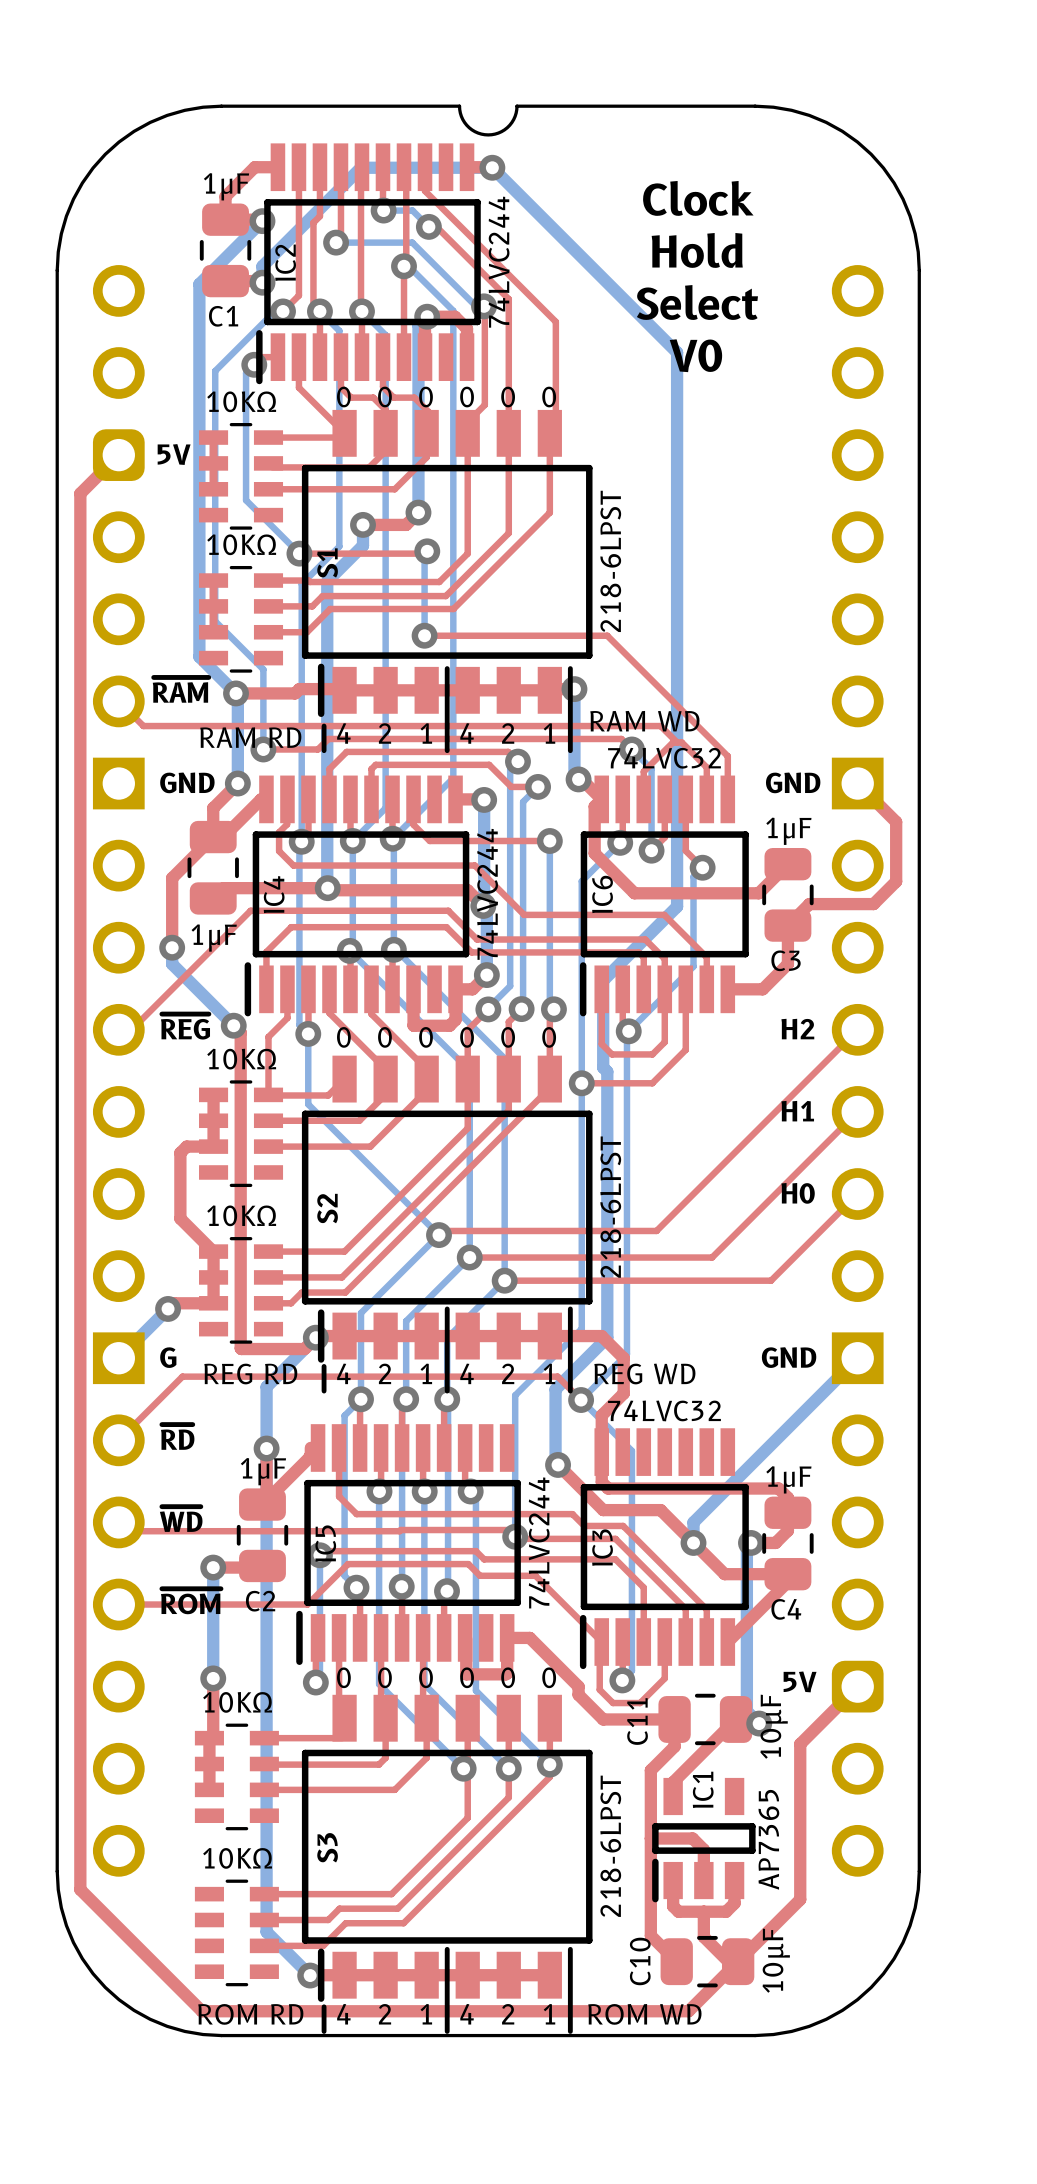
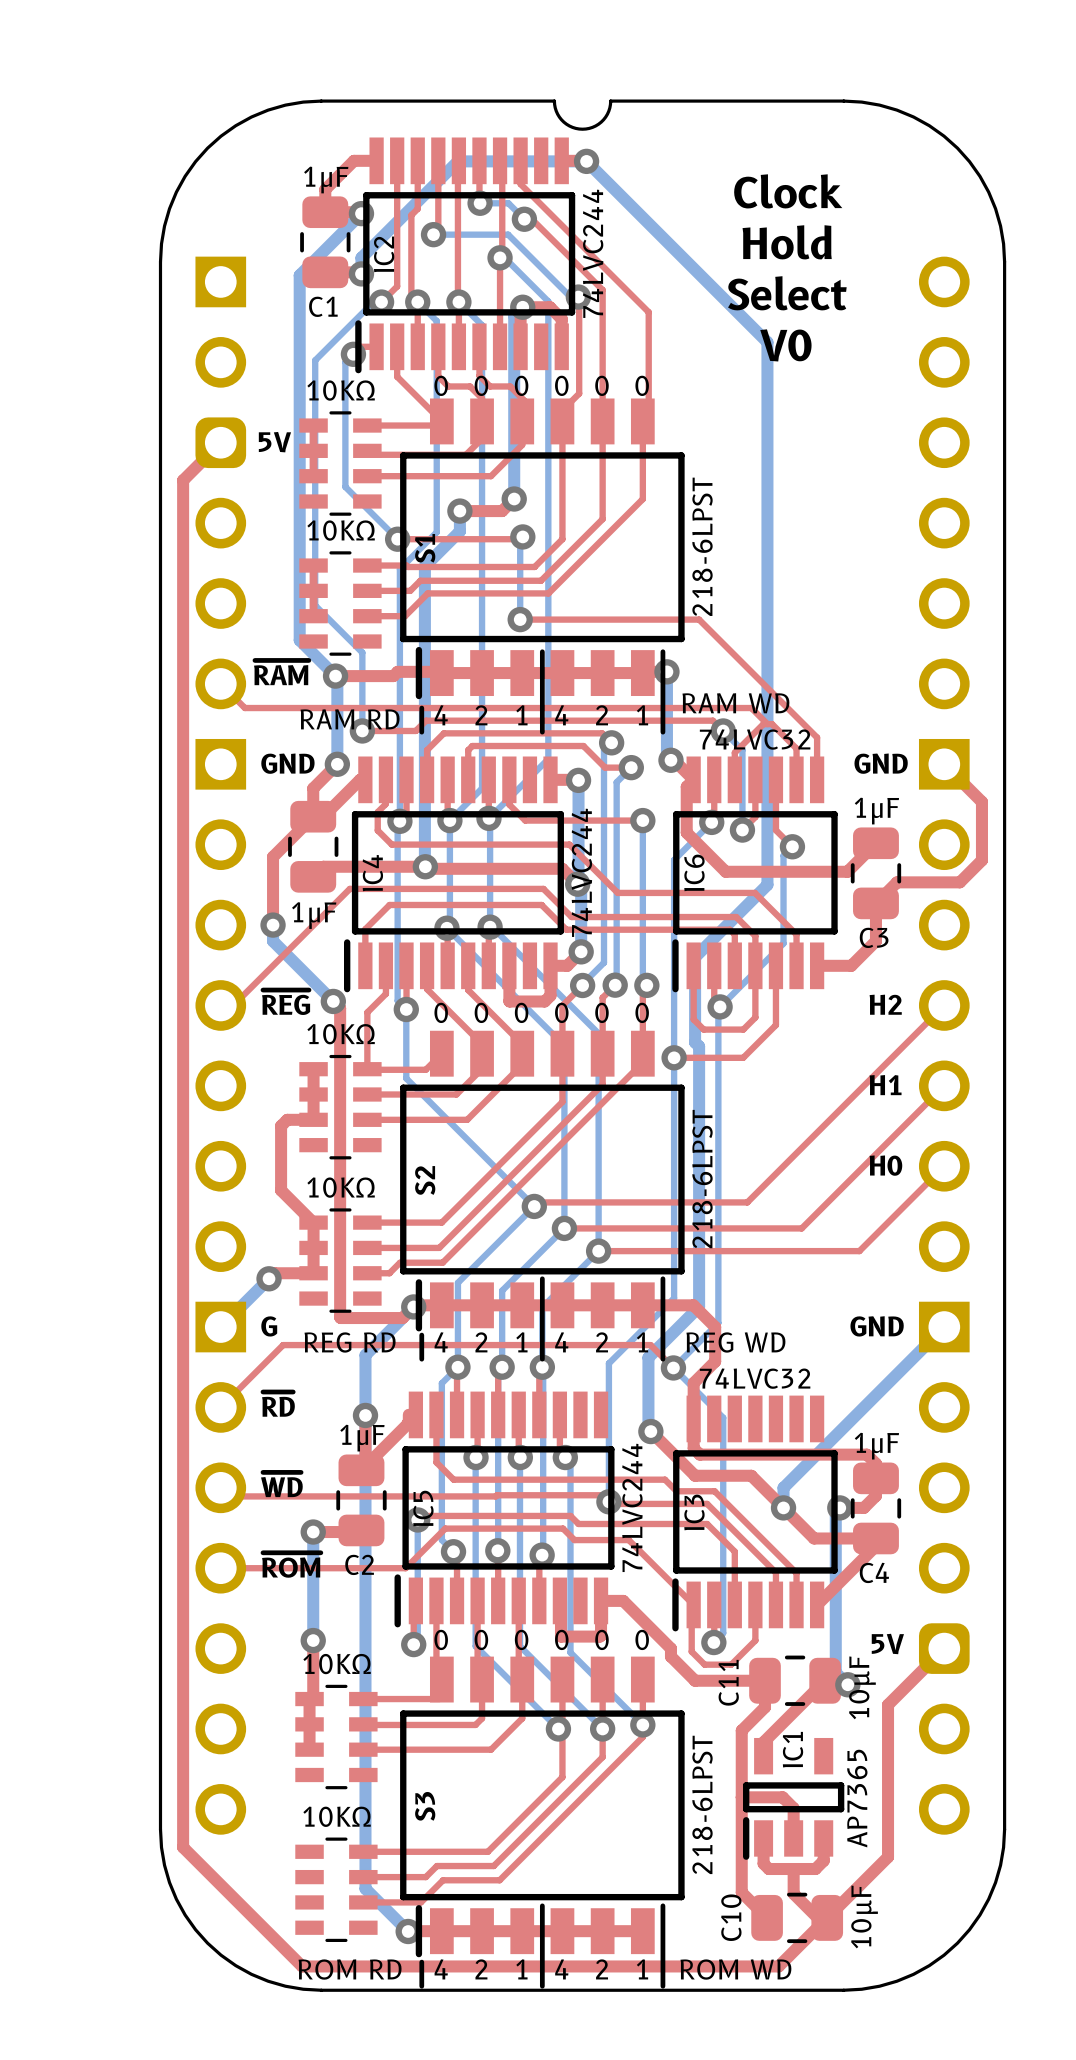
part footprint: [55, 104, 921, 2038] -> [158, 99, 1007, 1992]

